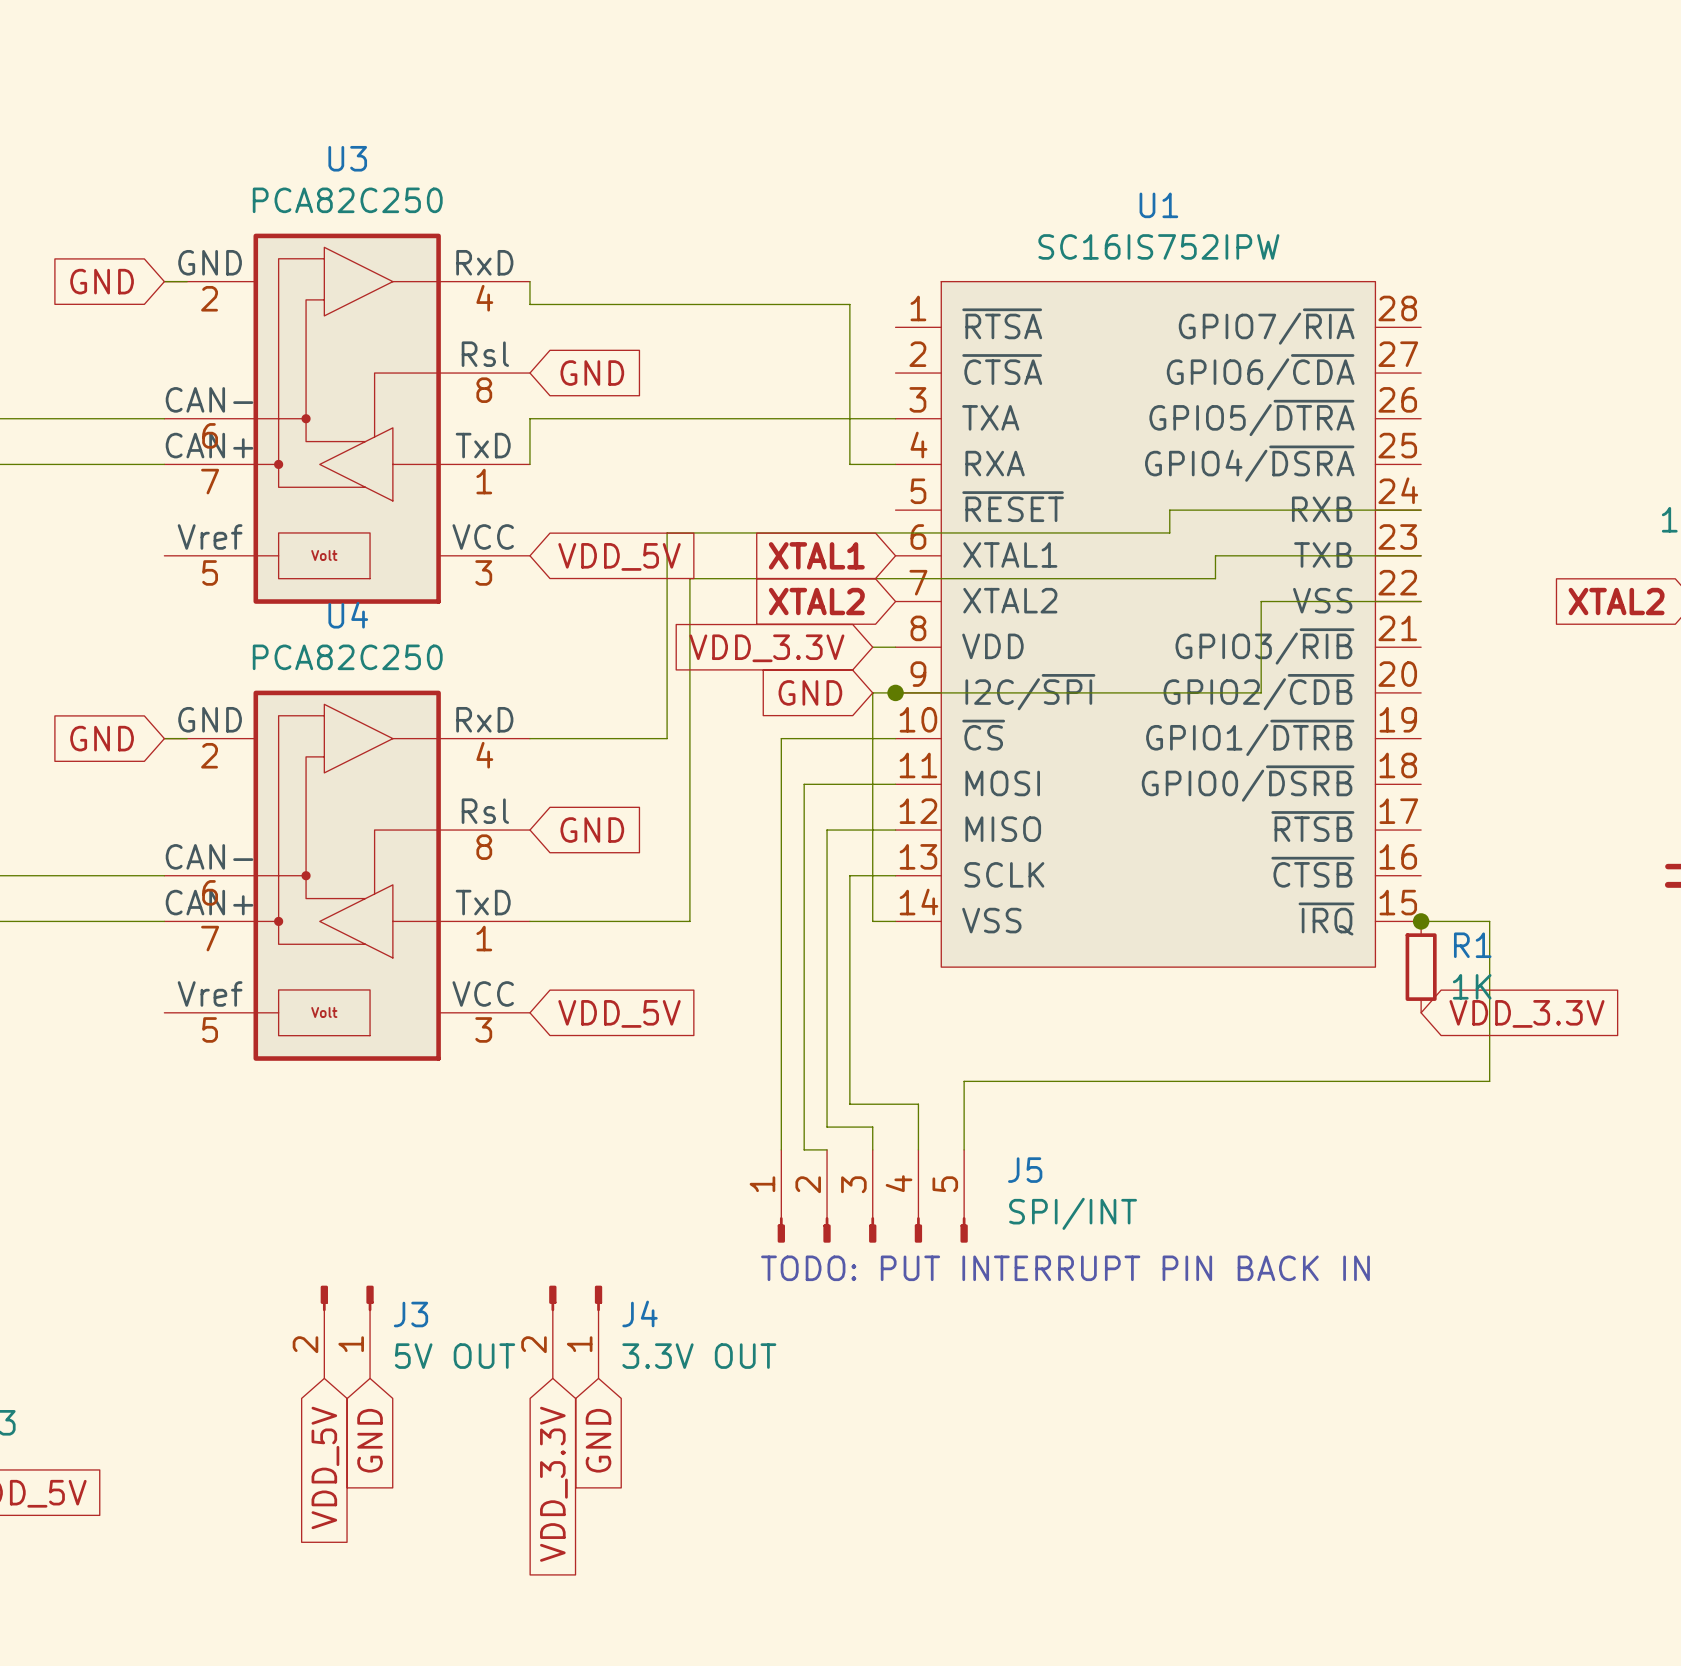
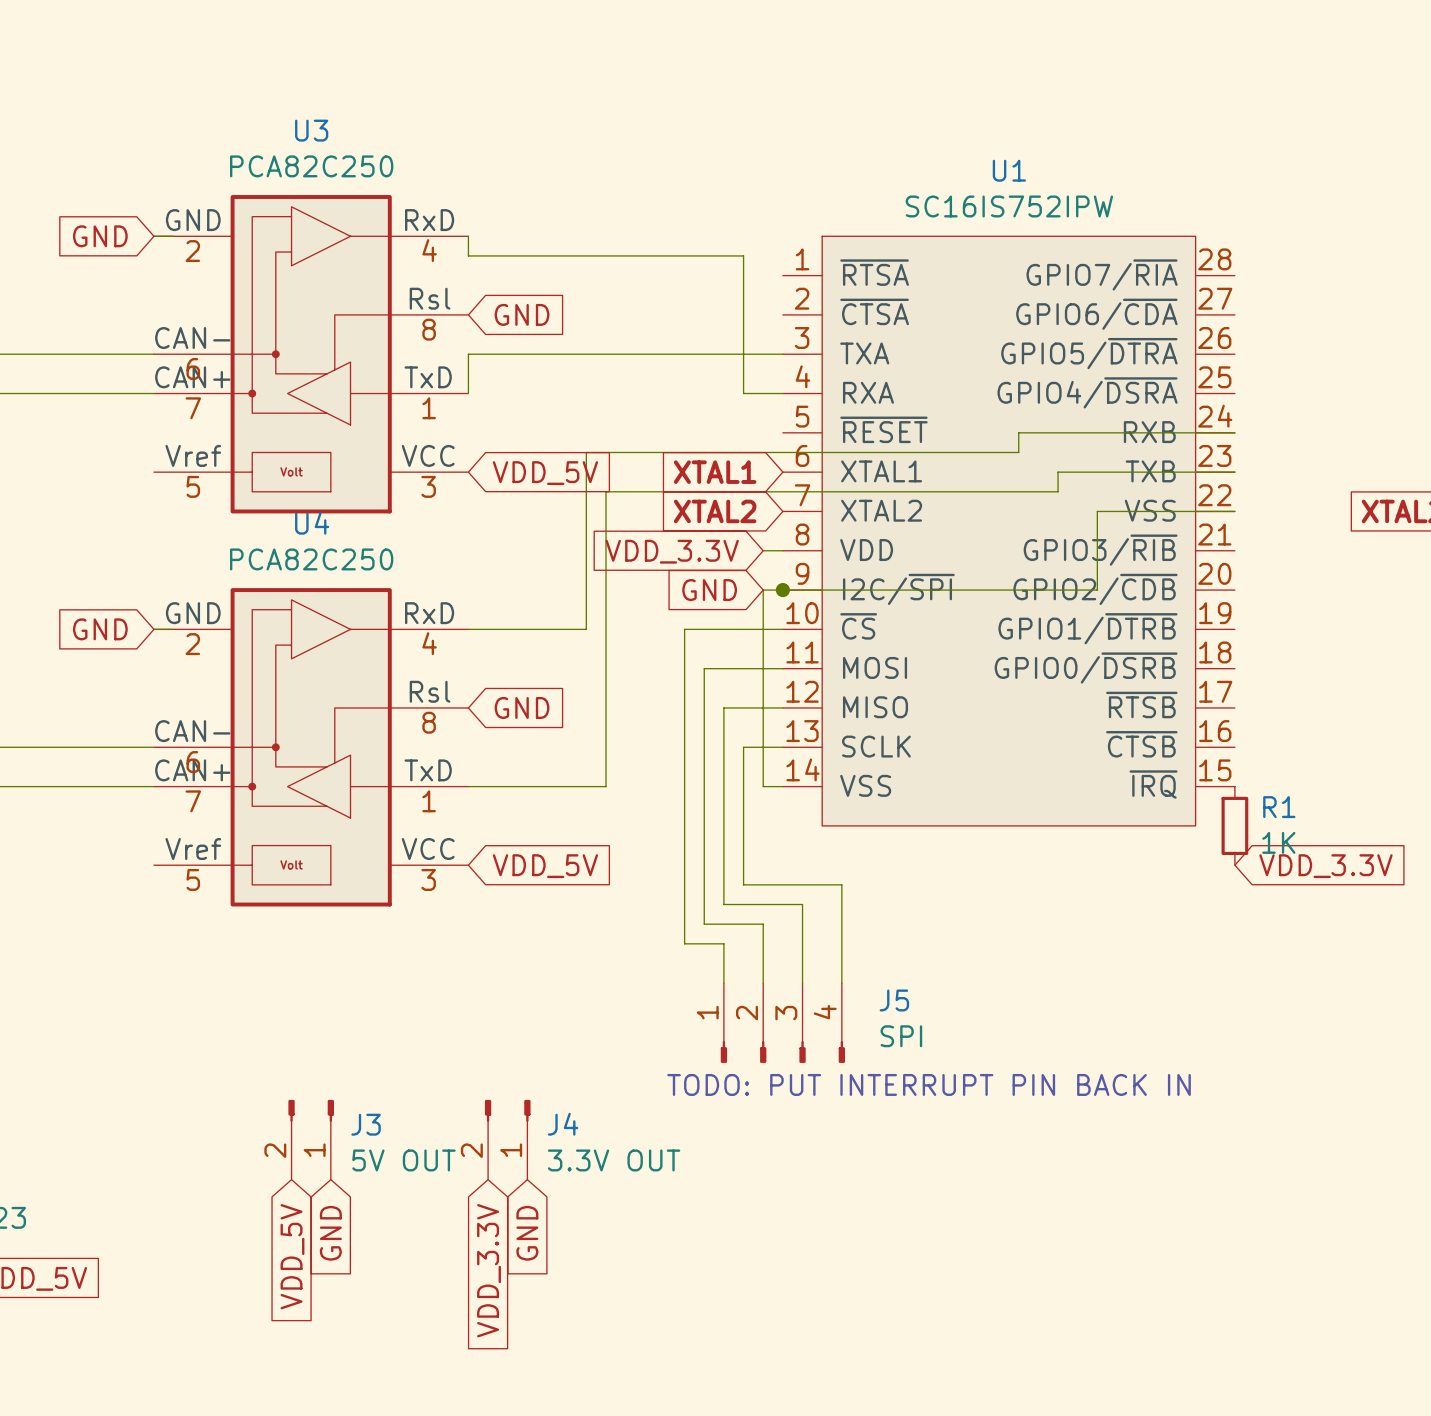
wire: (1421, 921) (1489, 921) (1489, 1081) (964, 1081) -> (743, 884) (841, 884) (841, 924)
junction: (1421, 921) -> none
wire: (849, 1035) (849, 1104) (918, 1104) -> (723, 904) (802, 904) (802, 943)
wire: (827, 1058) (827, 1104) -> (684, 943) (723, 943)
wire: (804, 1081) (804, 1149) (827, 1149) -> (723, 963) (723, 983)
wire: (781, 1104) (781, 1149) -> none
wire: (827, 1127) (872, 1127) -> (704, 924) (763, 924) (763, 963)
J5 symbol: [777, 1149, 968, 1243] -> [720, 983, 845, 1063]
J5 value: SPI/INT (1073, 1213) -> SPI (901, 1036)

